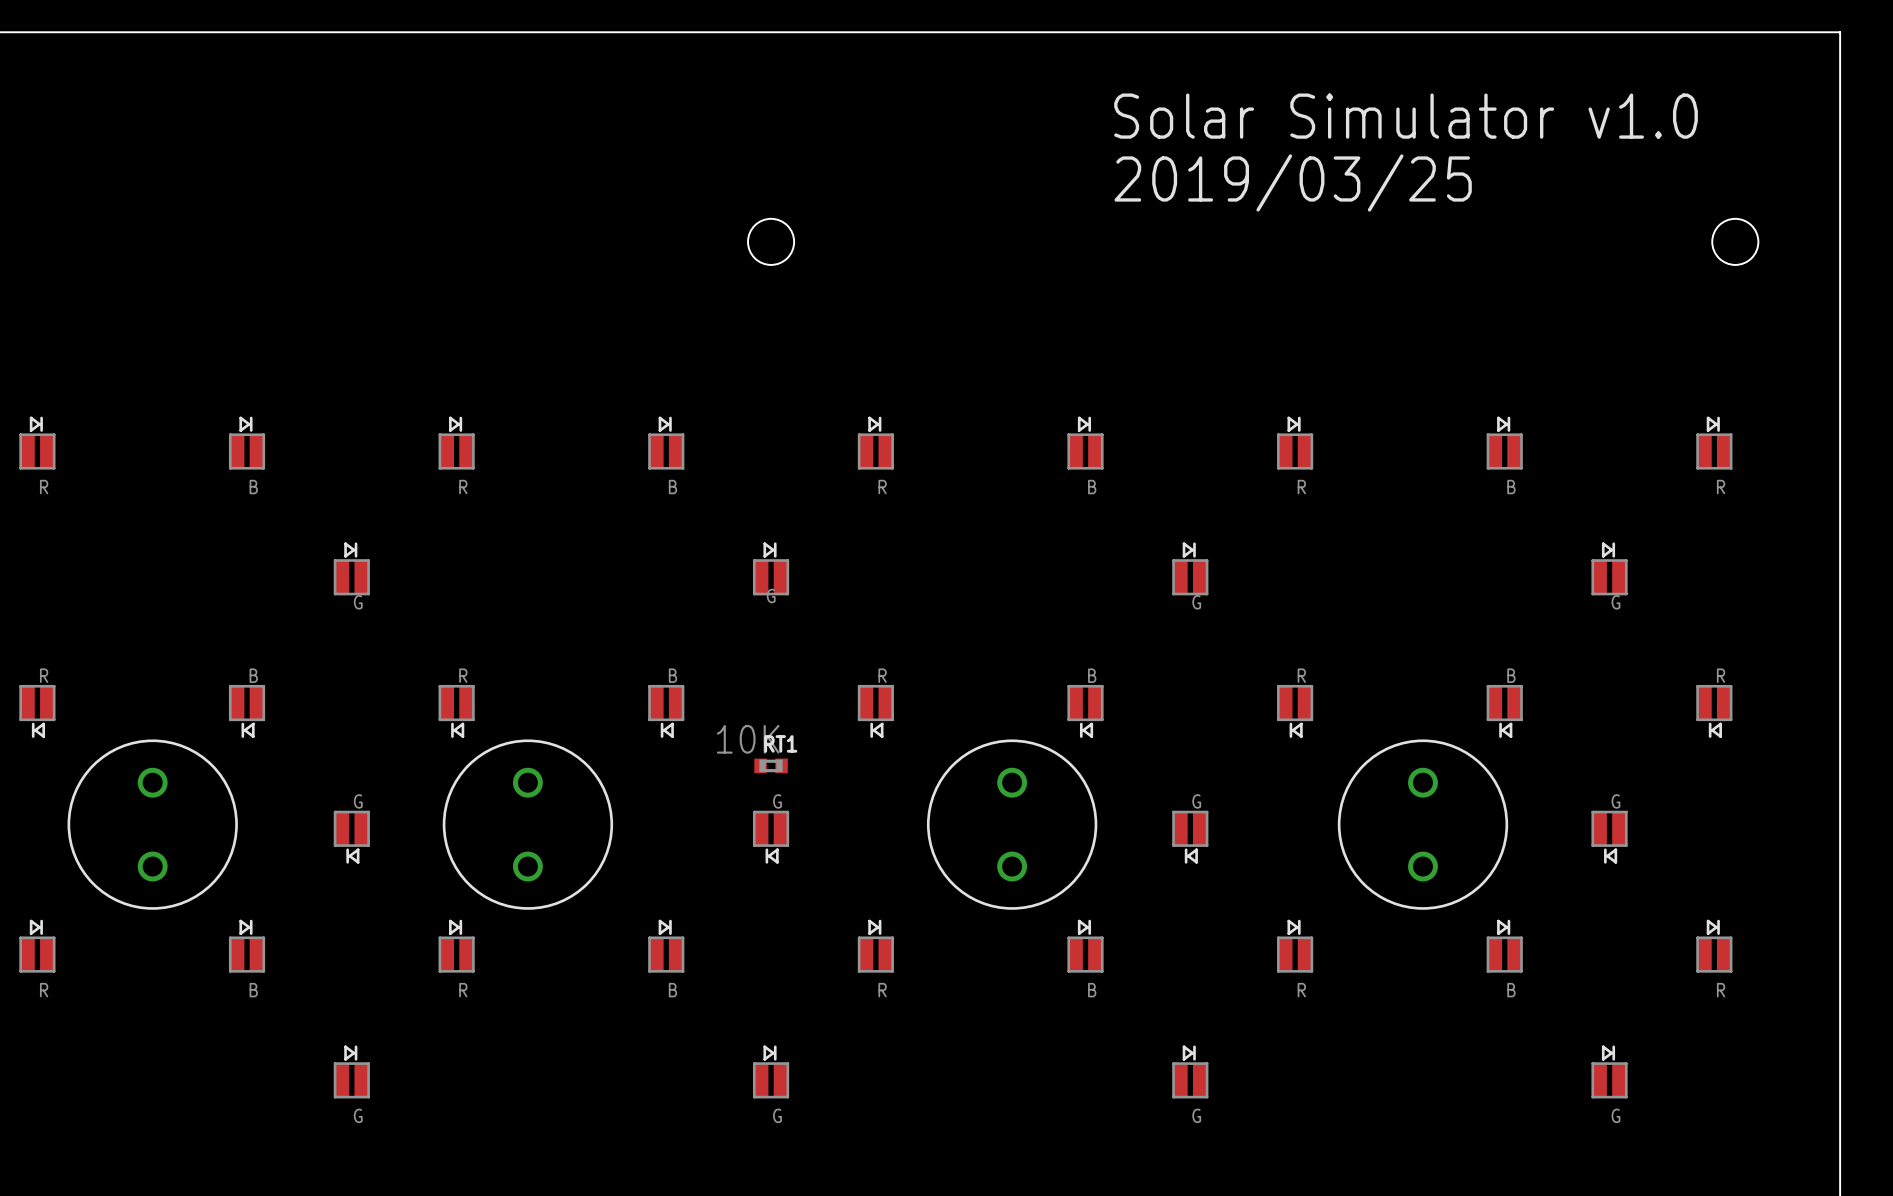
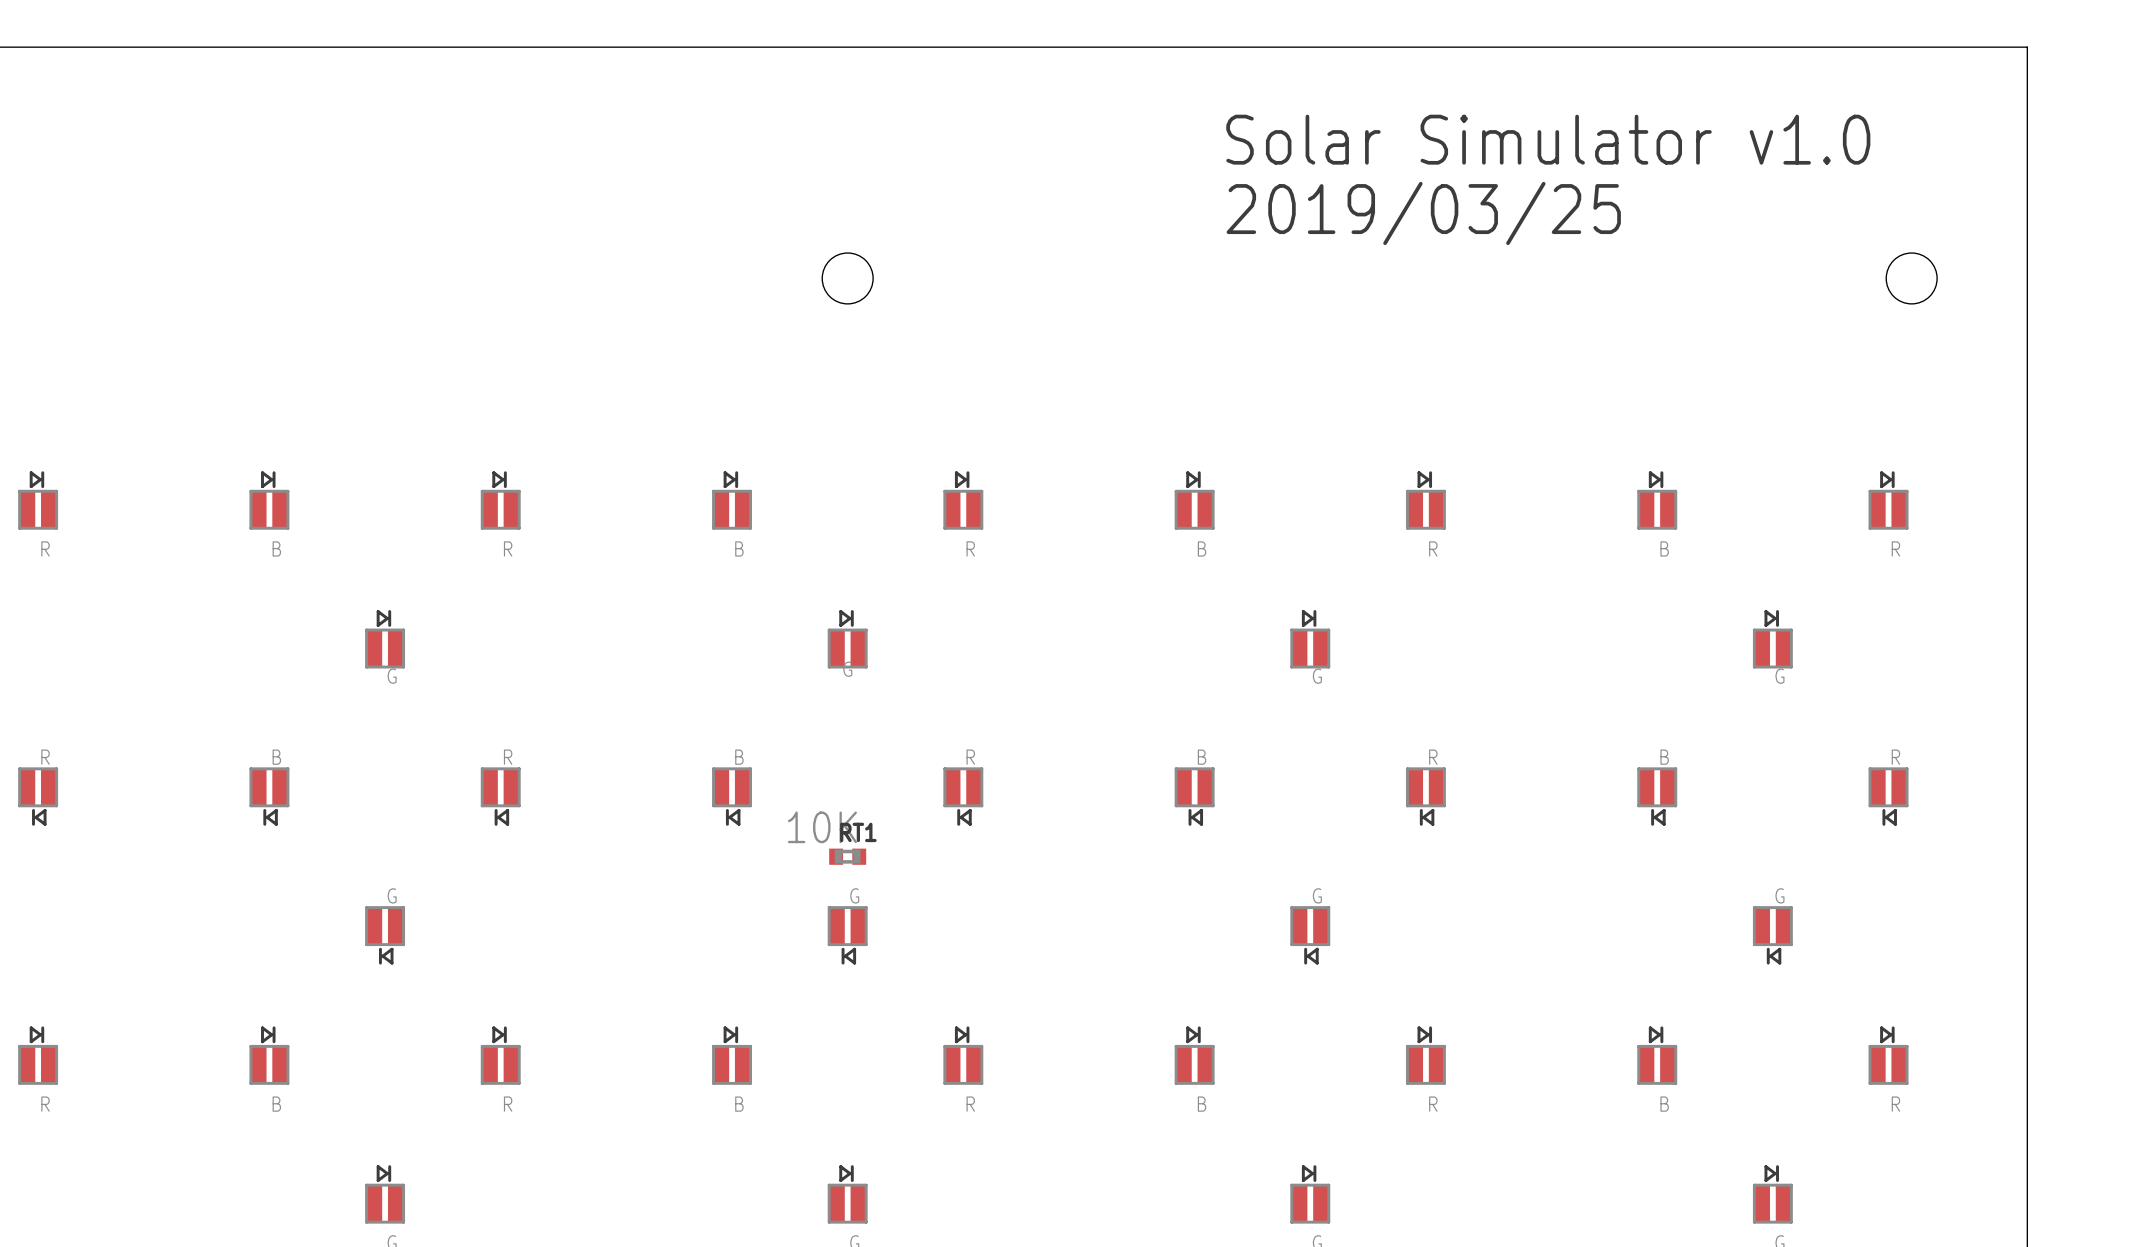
part: (152, 824) -> none
part: (527, 824) -> none
part: (1012, 824) -> none
part: (1422, 824) -> none

